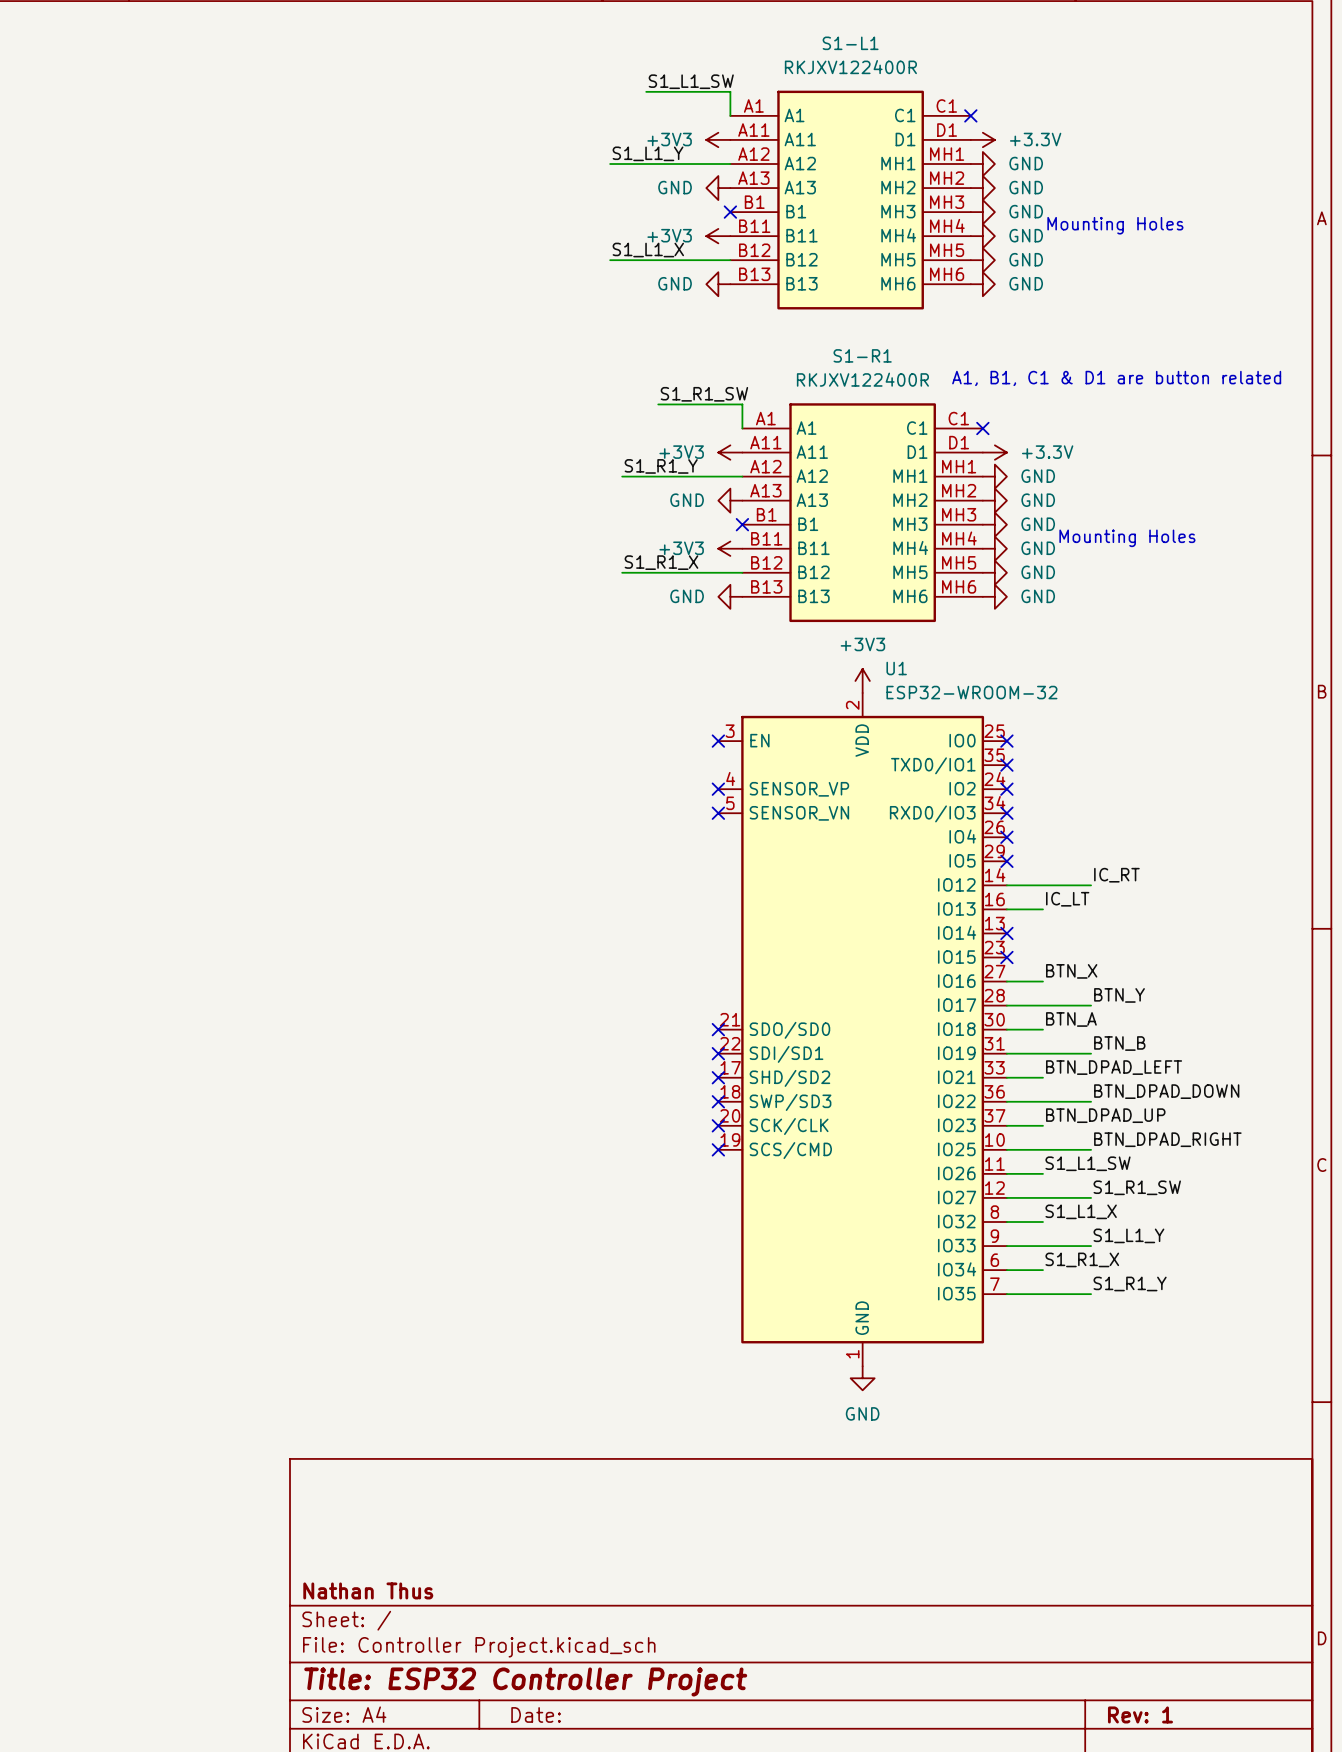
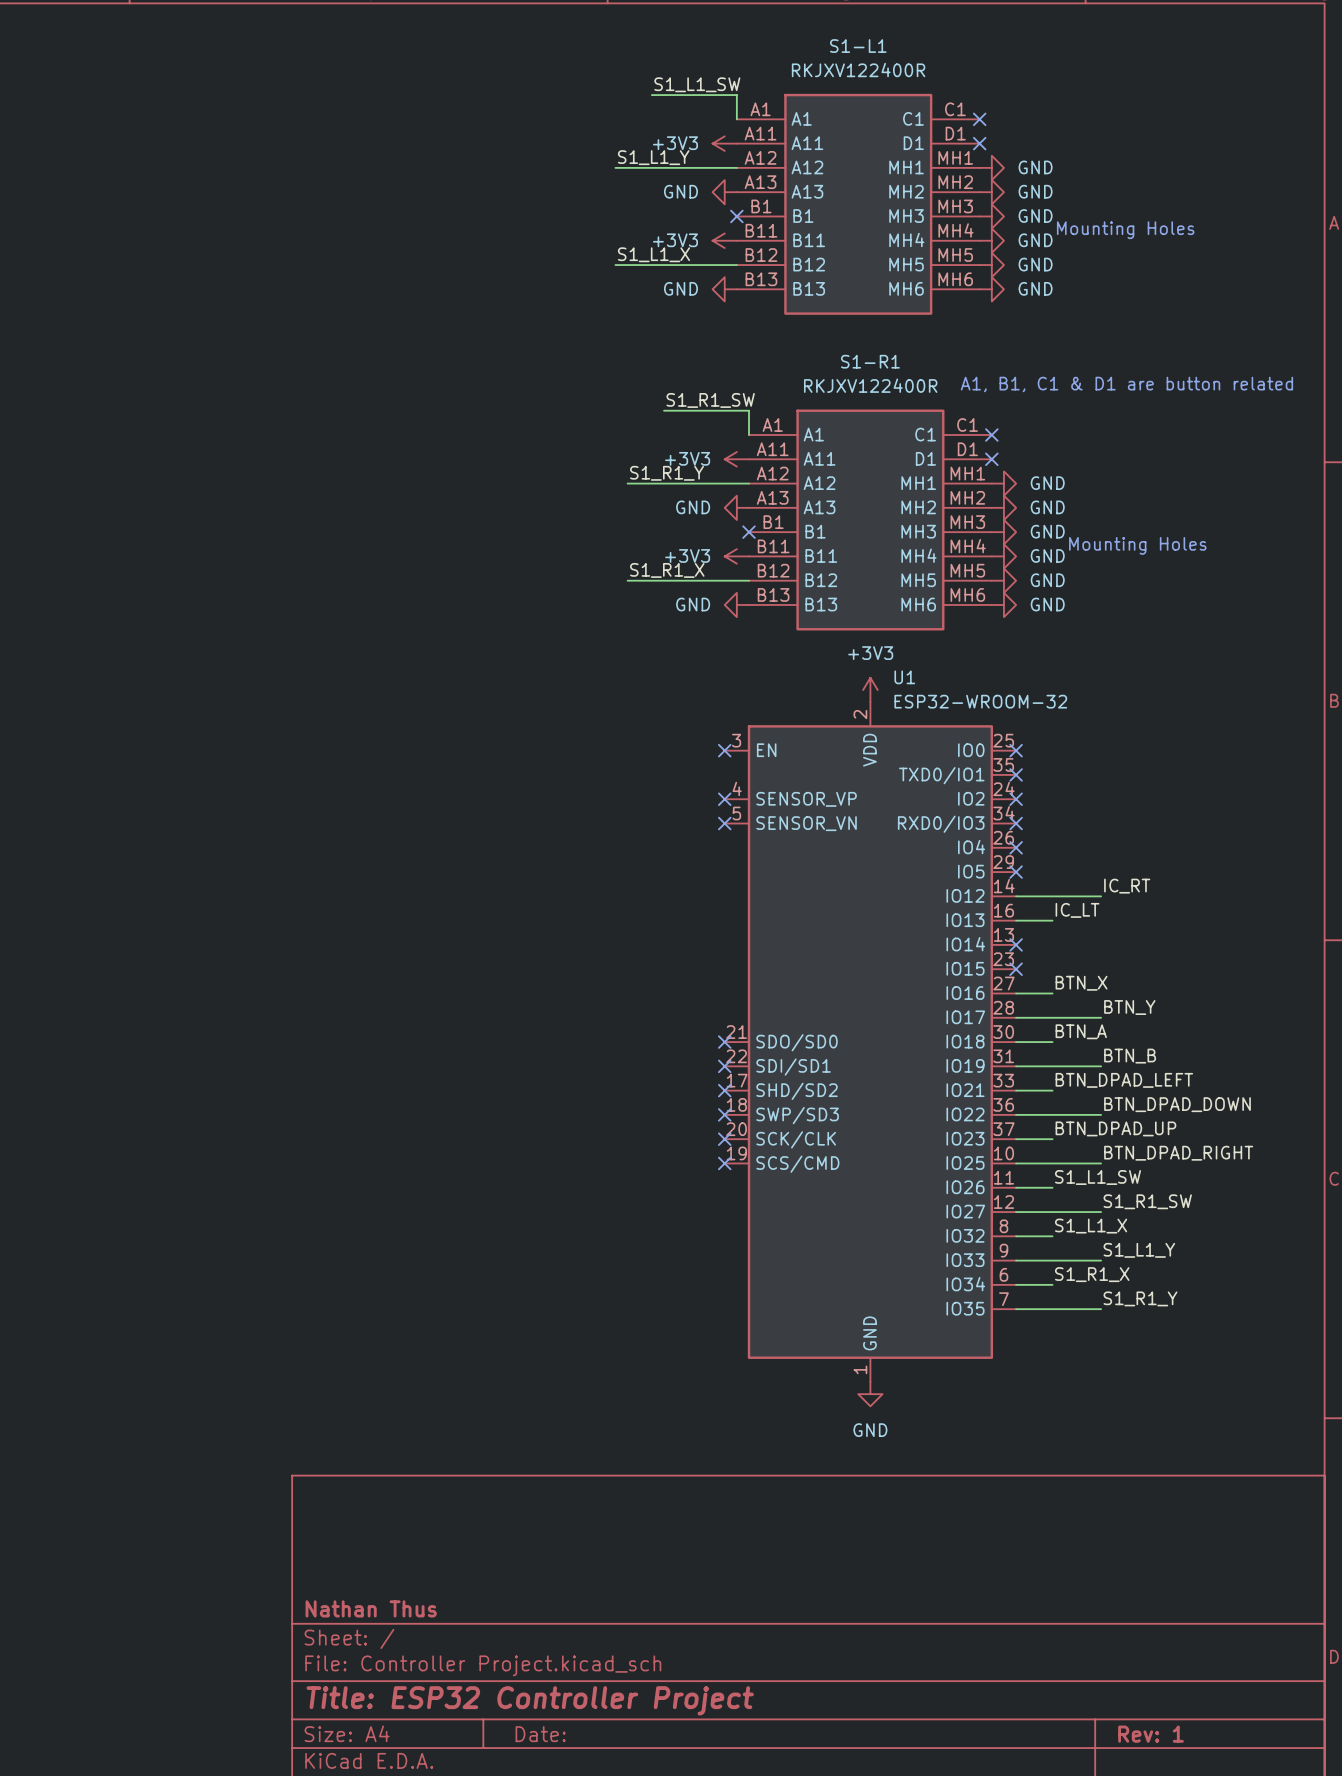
no-connect mark: none -> (979, 143)
power symbol: +3.3V (982, 139) -> none
no-connect mark: none -> (991, 459)
power symbol: +3.3V (994, 452) -> none

